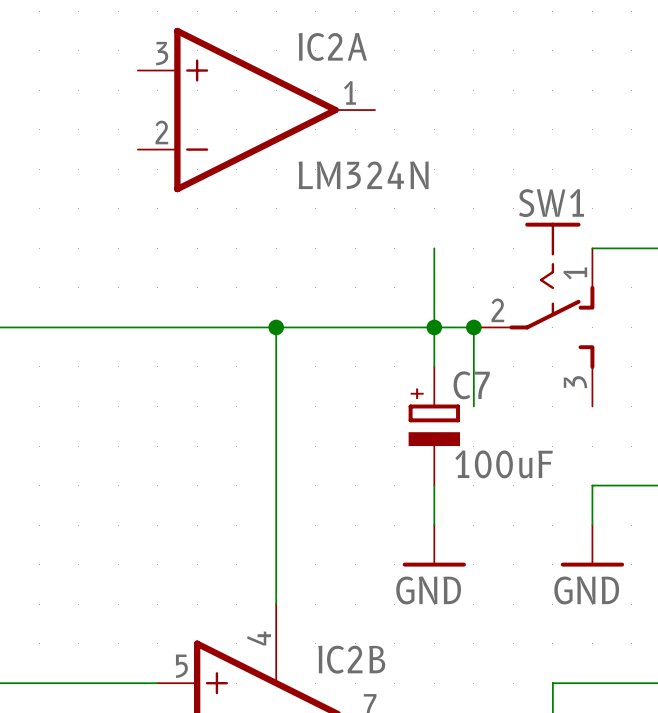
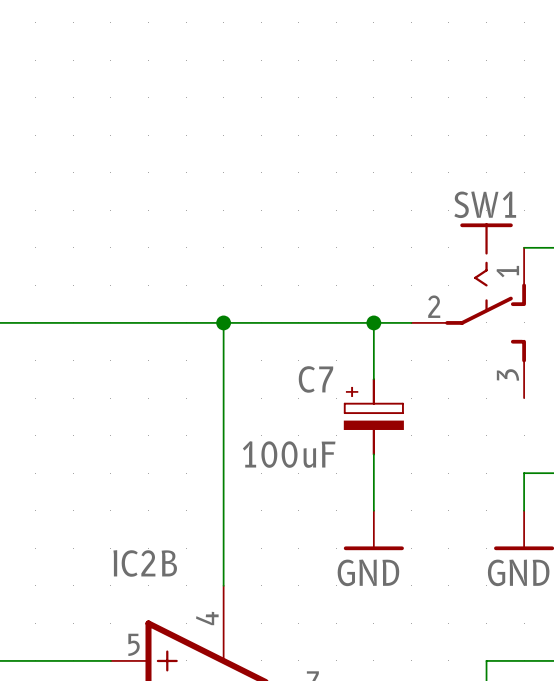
IC2A: LM324N (256, 110) -> none
wire: (434, 248) (434, 327) -> none
wire: (473, 327) (473, 406) -> none
junction: (473, 327) -> none
C7 symbol: [408, 366, 461, 486] -> [343, 378, 404, 456]
C7 name position: C7 (471, 385) -> C7 (315, 379)
C7 value position: 100uF (504, 464) -> 100uF (289, 454)
IC2B name position: IC2B (351, 659) -> IC2B (145, 563)

